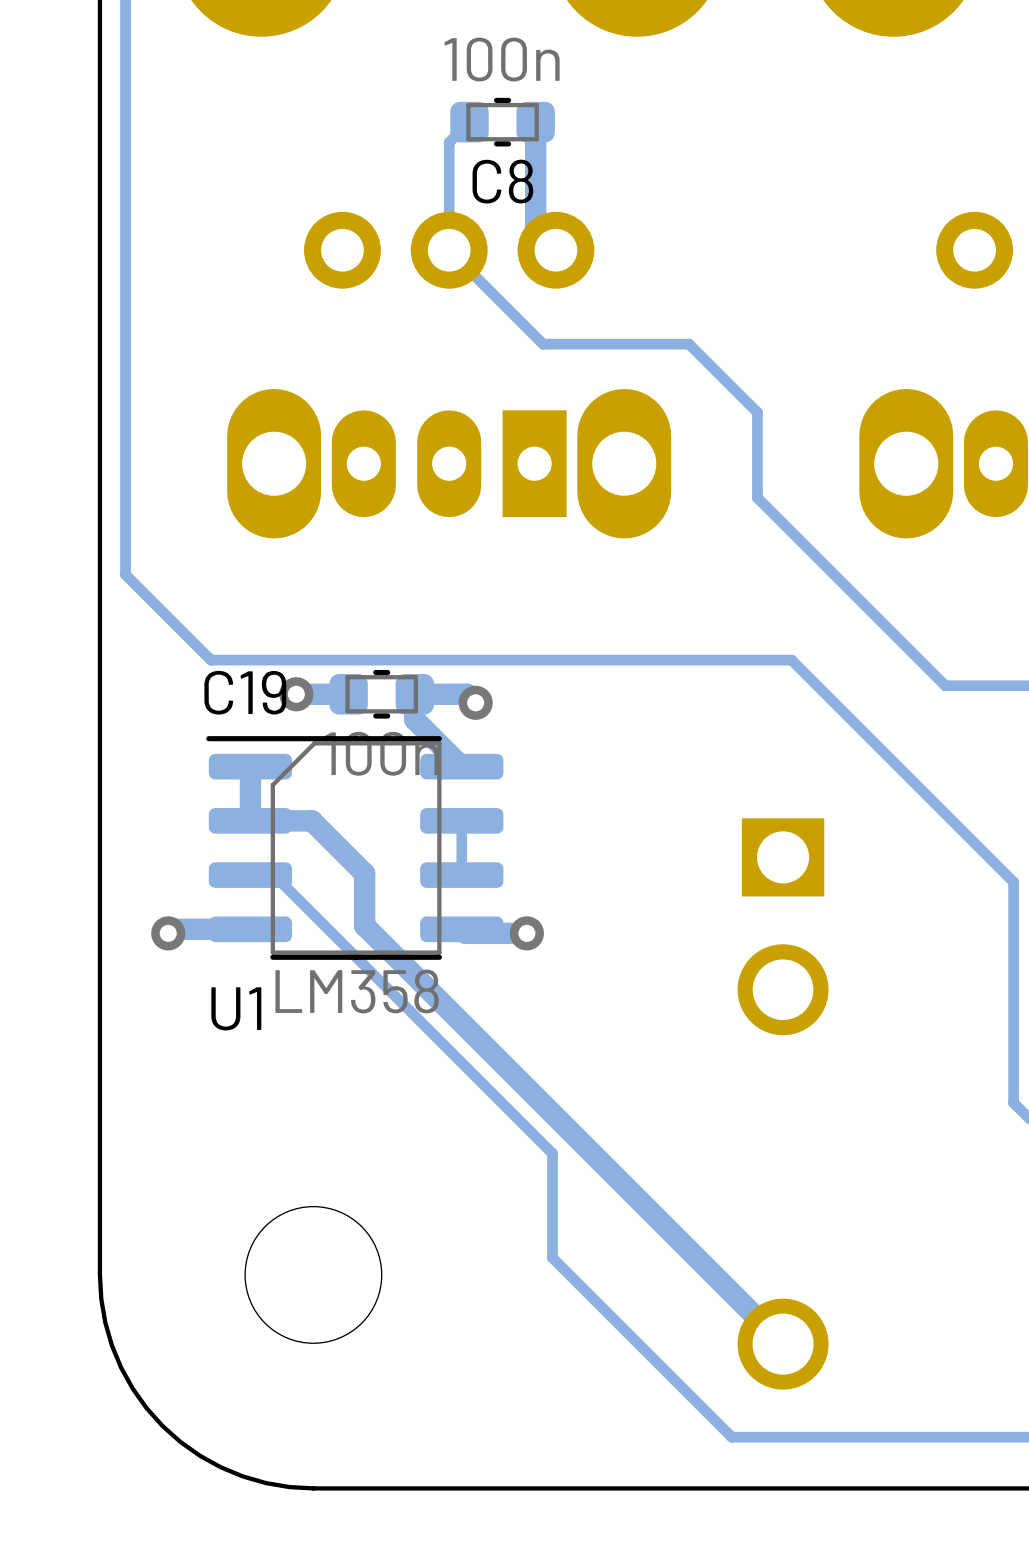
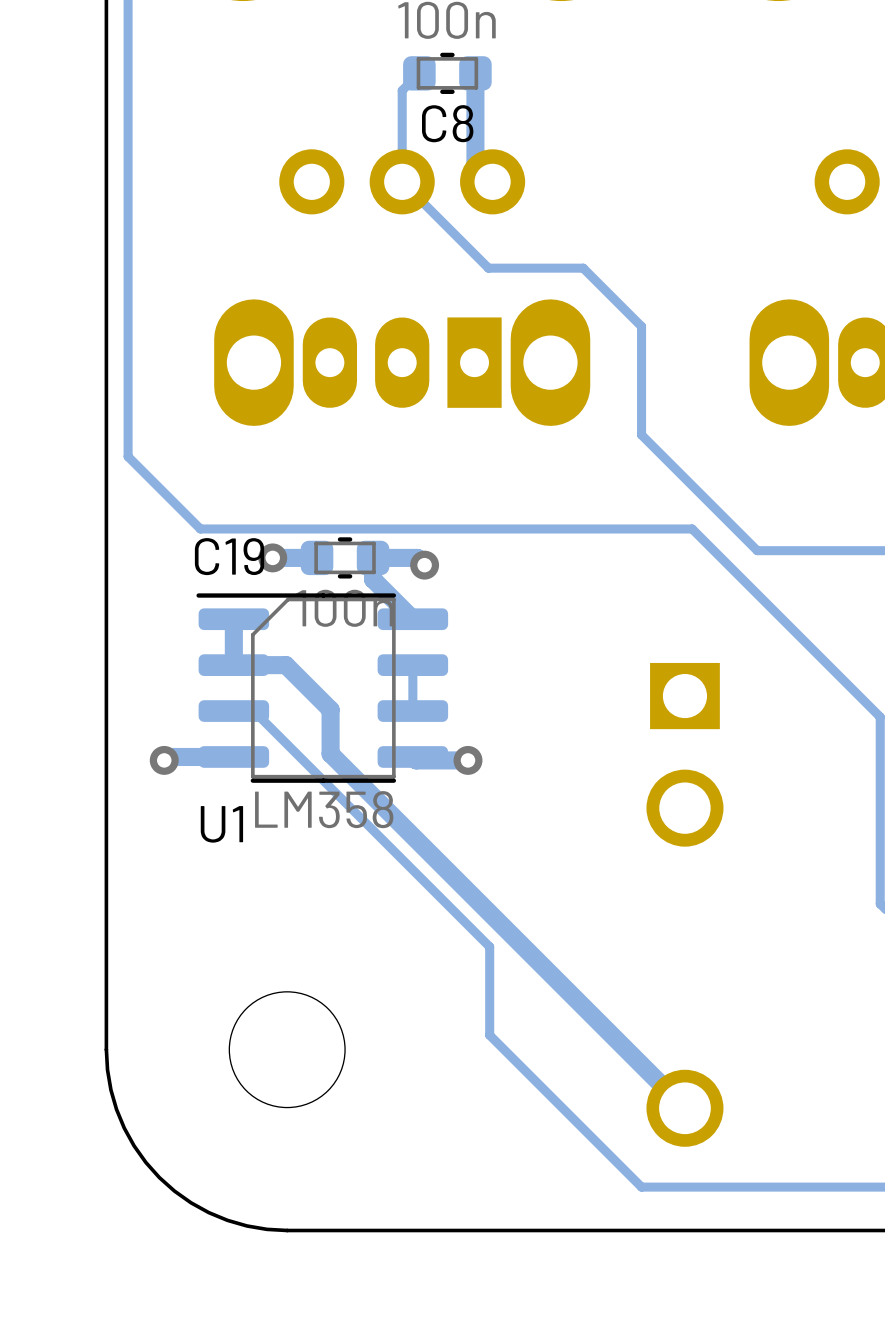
track: (543, 344) (689, 344) (757, 412) (757, 497) (945, 685) -> (481, 261) (488, 268) (583, 268) (641, 326) (641, 434) (757, 550) (822, 550)

